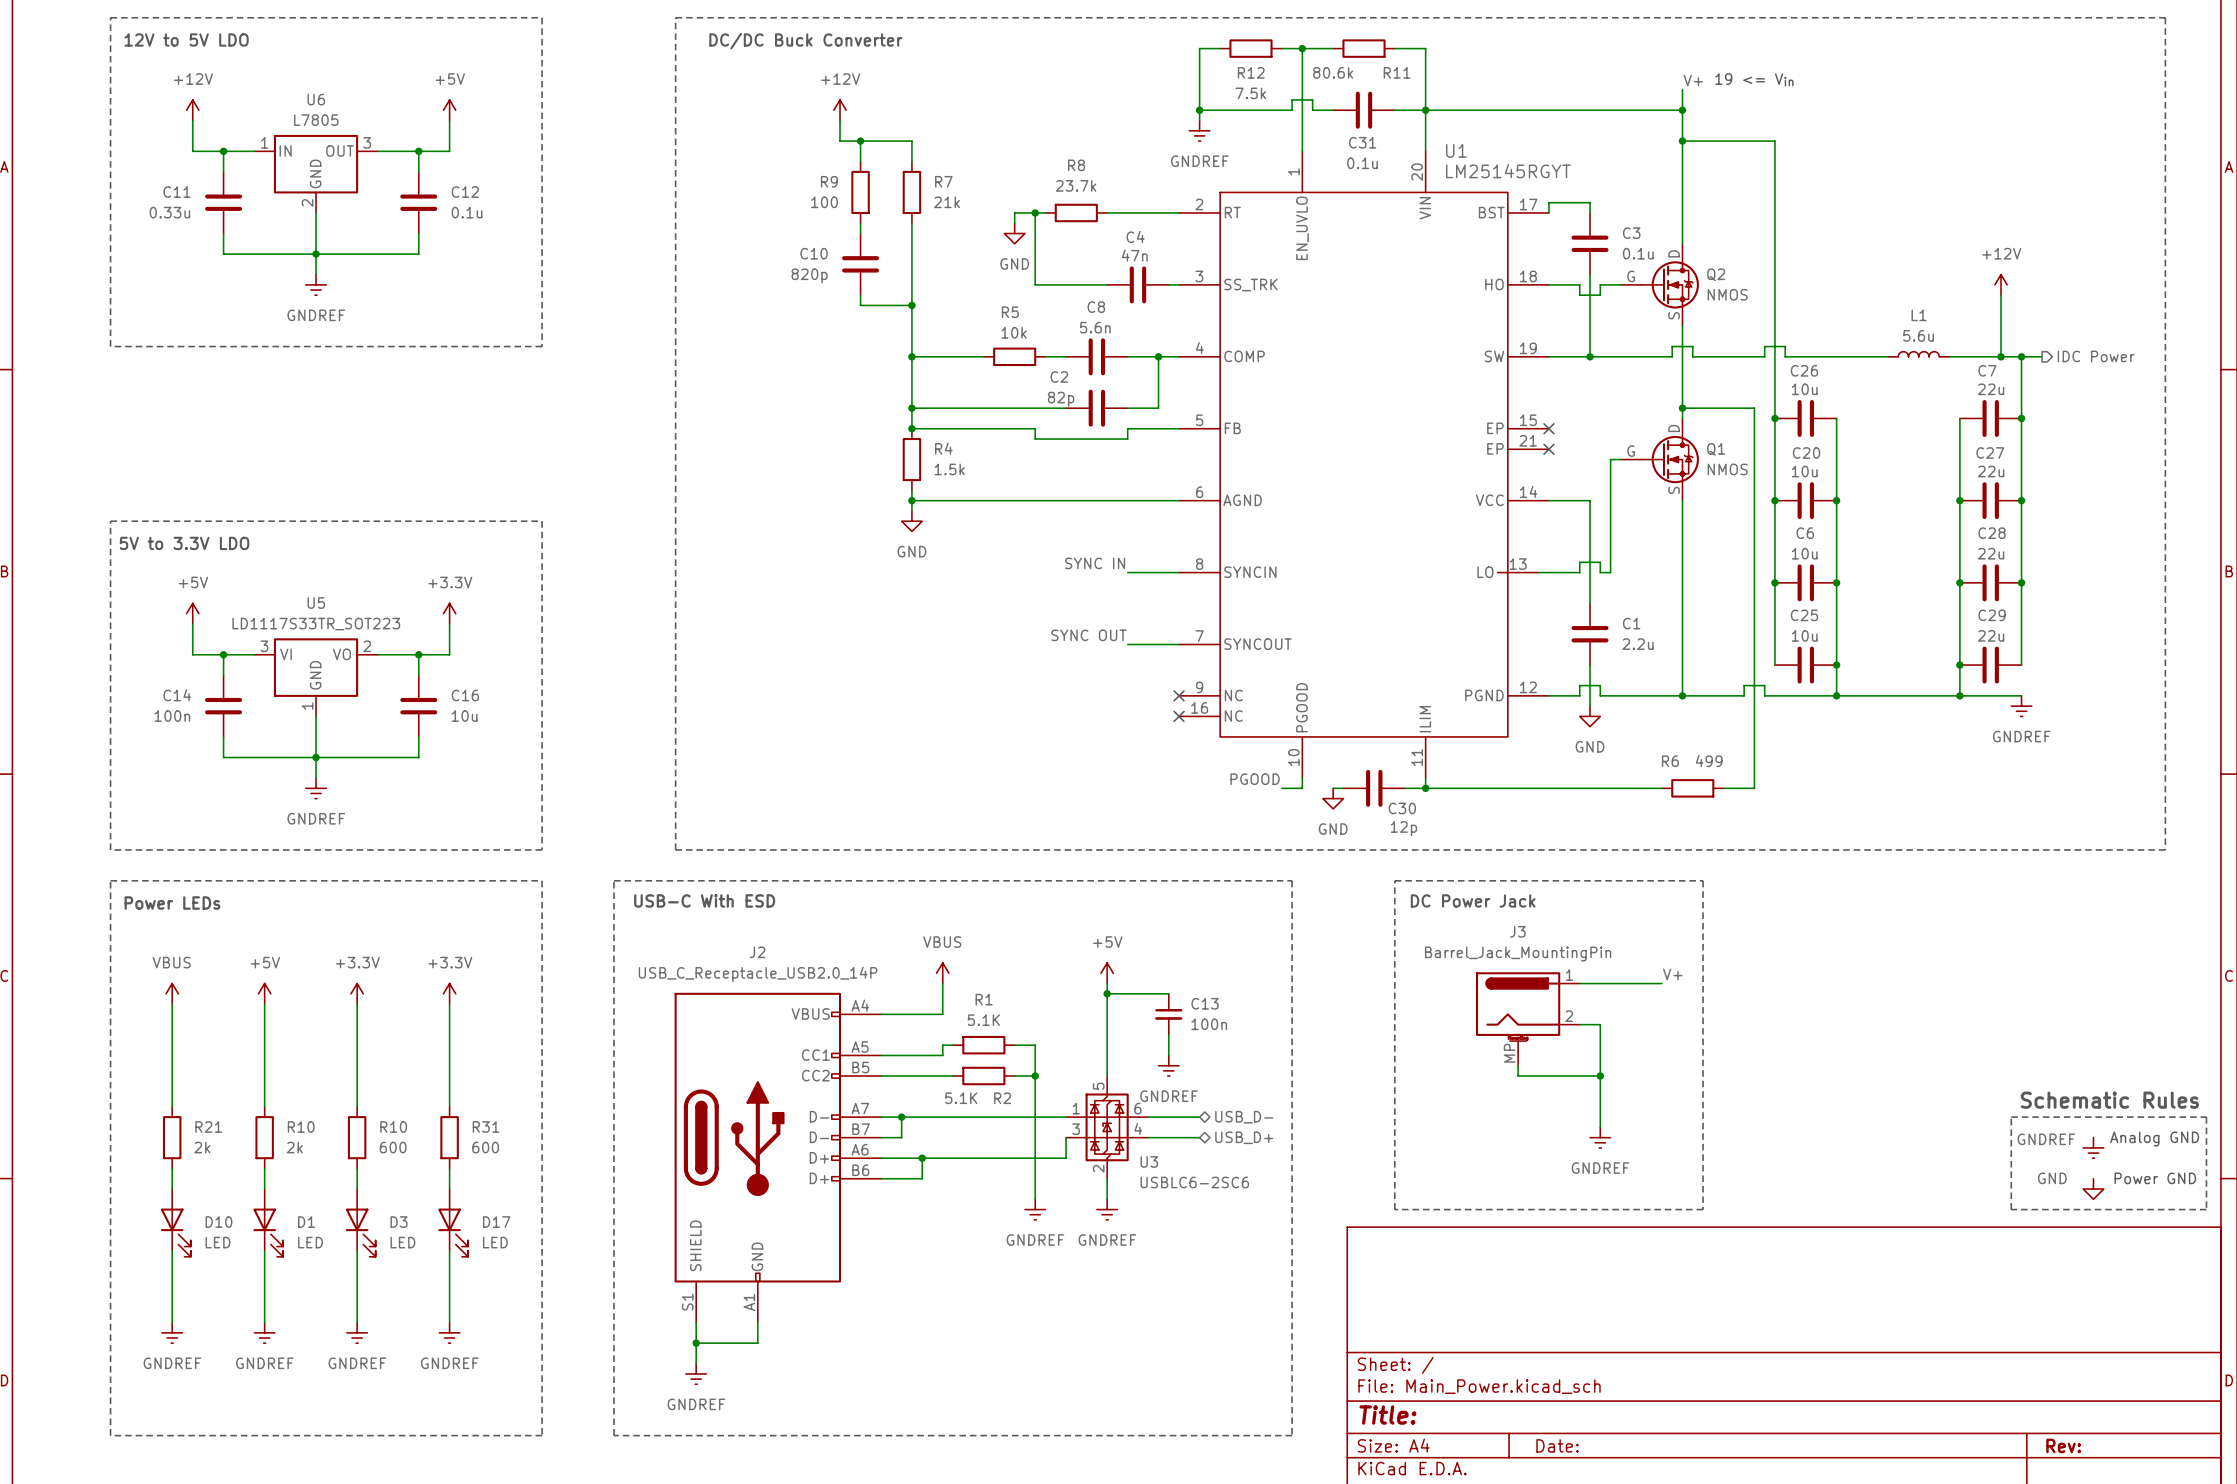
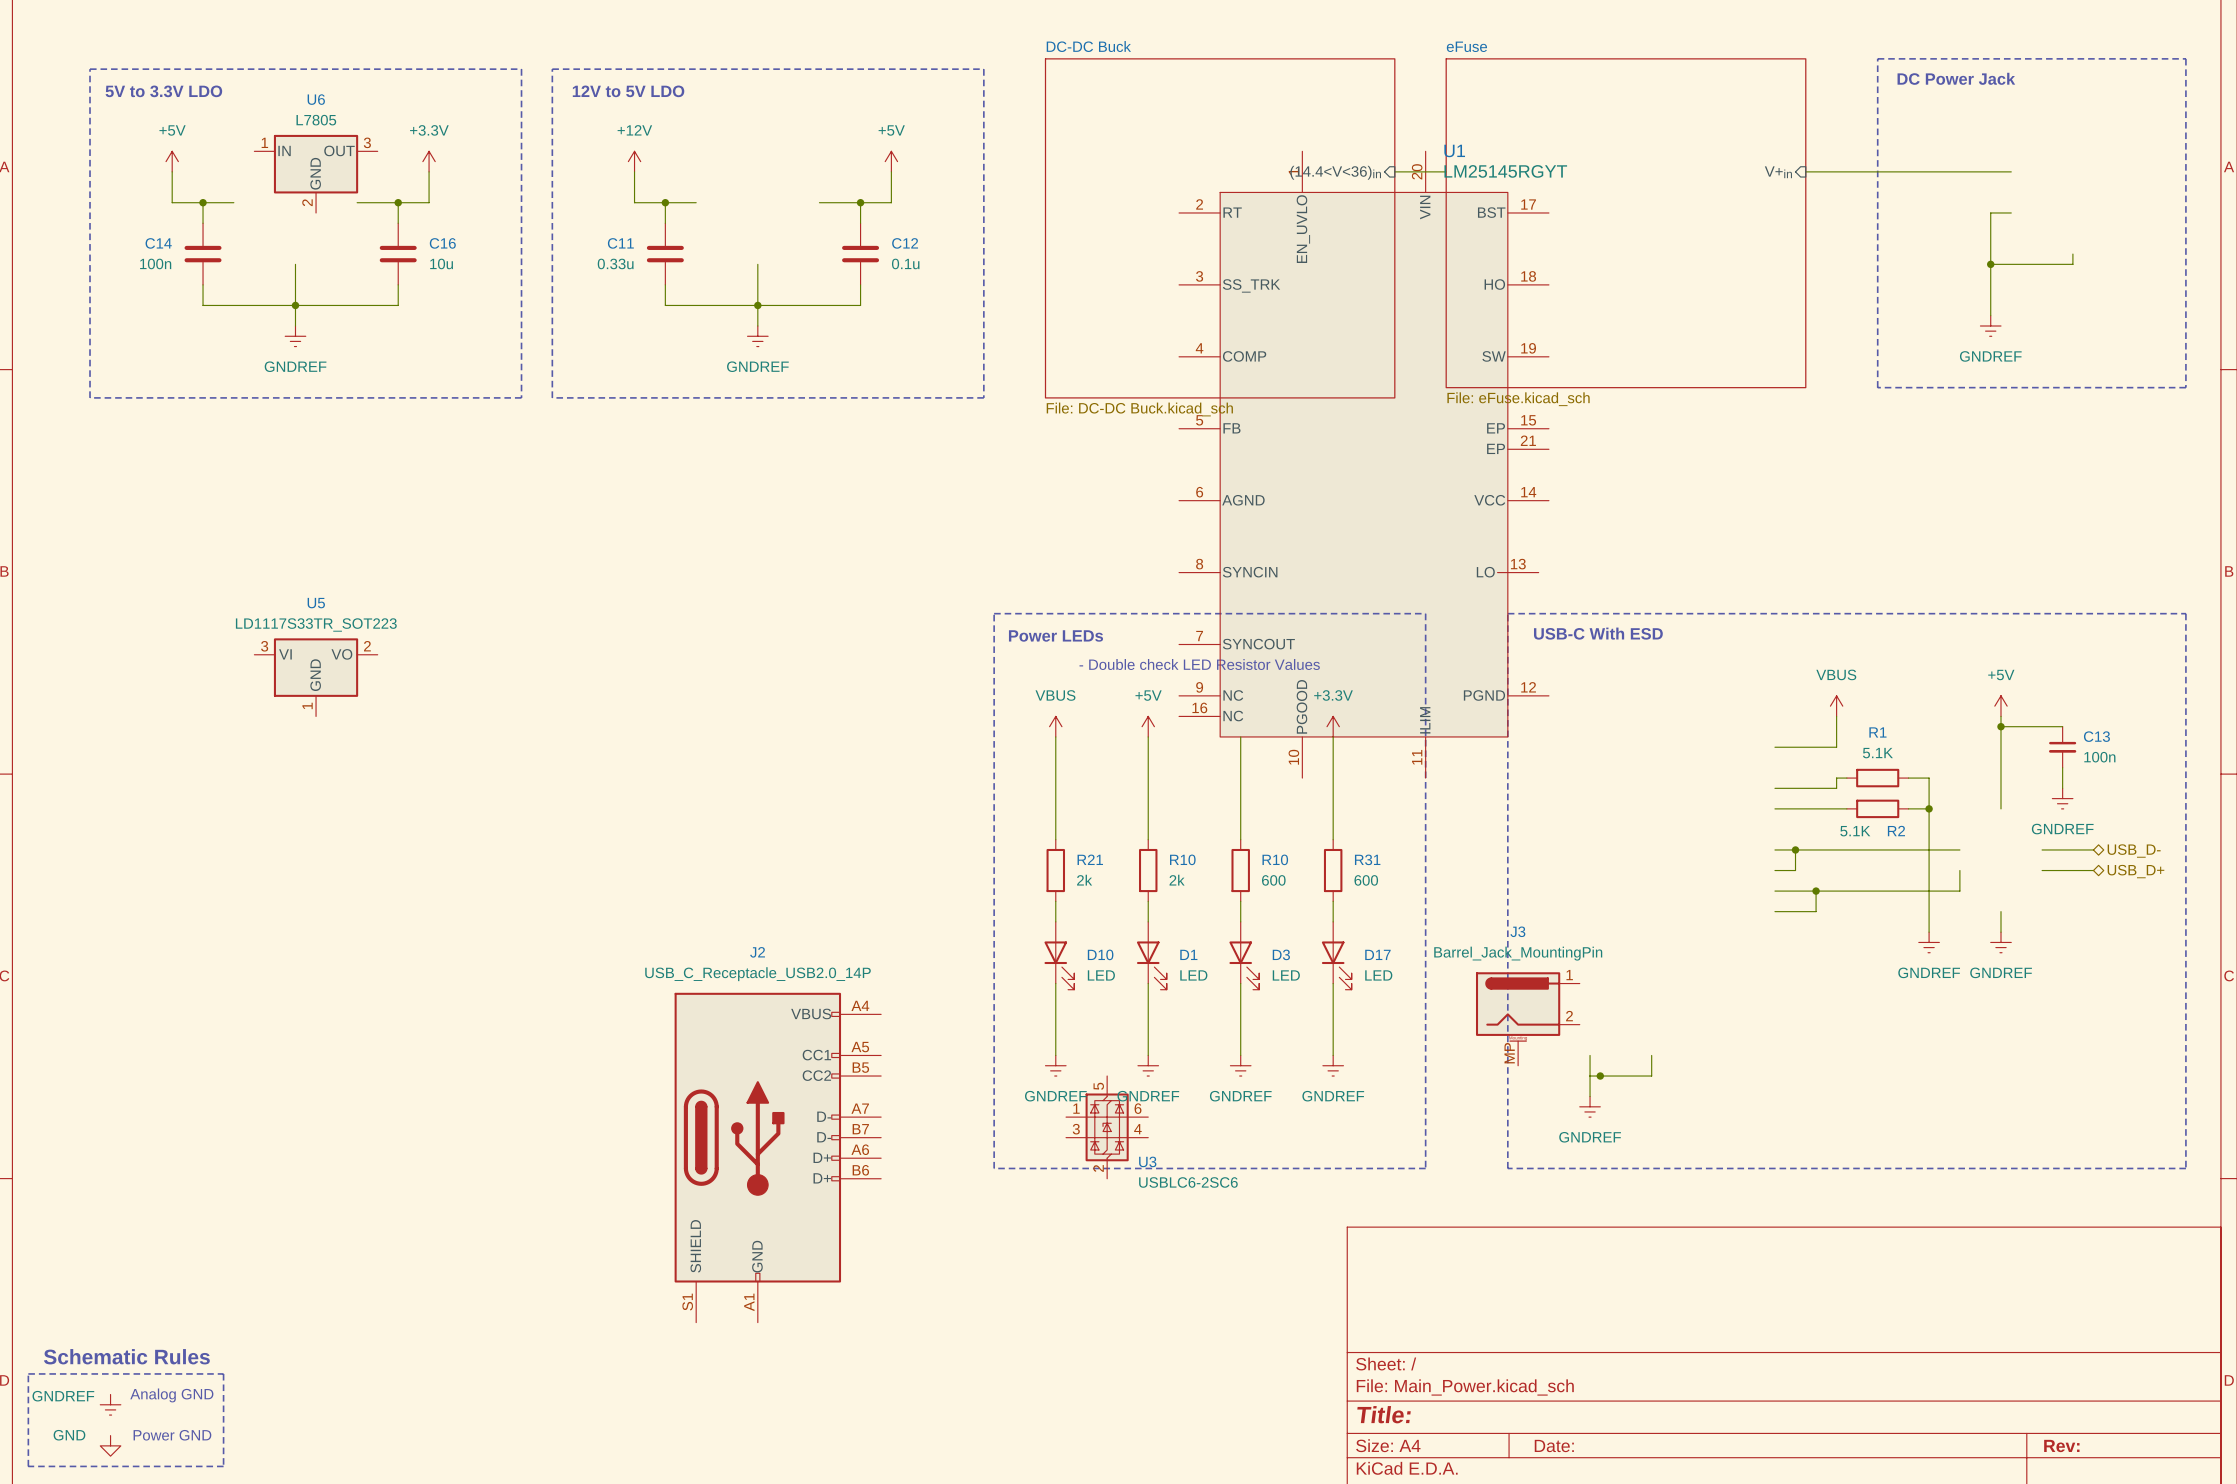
line: (110, 17) (110, 346) (542, 346) (542, 17) (110, 17) -> (90, 69) (90, 397) (521, 397) (521, 69) (90, 69)
line: (675, 17) (2165, 17) (2165, 849) (675, 849) (675, 17) -> none
text: 12V to 5V LDO (186, 39) -> none
text: DC/DC Buck Converter (805, 41) -> none
wire: (1220, 48) (1199, 48) (1199, 120) -> none
R12: 7.5k (1250, 48) -> none
wire: (1281, 48) (1333, 48) -> (1394, 171) (1446, 171)
wire: (1302, 48) (1302, 151) -> none
junction: (1302, 48) -> none
R11: 80.6k (1364, 48) -> none
wire: (1394, 48) (1425, 48) (1425, 151) -> none
line: none -> (1877, 58) (2185, 58) (2185, 387) (1877, 387) (1877, 58)
line: none -> (552, 69) (983, 69) (983, 397) (552, 397) (552, 69)
text: 19 <= Vin (1754, 79) -> none
text: none -> DC Power Jack (1956, 78)
label: V+ (1693, 80) -> none
wire: (1682, 89) (1682, 243) -> none
text: none -> 5V to 3.3V LDO (163, 91)
text: none -> 12V to 5V LDO (628, 91)
power symbol: +12V (192, 110) -> none
power symbol: +5V (449, 110) -> none
power symbol: +12V (840, 110) -> none
wire: (1199, 110) (1292, 110) (1292, 99) (1312, 99) (1312, 110) (1333, 110) -> none
junction: (1199, 110) -> none
C31: 0.1u (1364, 110) -> none
wire: (1394, 110) (1682, 110) -> none
junction: (1425, 110) -> none
junction: (1682, 110) -> none
wire: (192, 120) (192, 151) (254, 151) -> (172, 171) (172, 202) (233, 202)
wire: (449, 120) (449, 151) (377, 151) -> (429, 171) (429, 202) (357, 202)
wire: (840, 120) (840, 141) (911, 141) (911, 161) -> none
power symbol: GNDREF (1199, 130) -> none
wire: (860, 141) (860, 161) -> none
junction: (860, 141) -> none
wire: (1682, 141) (1774, 141) (1774, 665) -> none
junction: (1682, 141) -> none
wire: (223, 151) (223, 171) -> (203, 202) (203, 223)
junction: (223, 151) -> none
wire: (418, 151) (418, 171) -> (398, 202) (398, 223)
junction: (418, 151) -> none
power symbol: none -> +5V (172, 161)
power symbol: none -> +3.3V (429, 161)
power symbol: none -> +12V (634, 161)
power symbol: none -> +5V (891, 161)
wire: none -> (634, 171) (634, 202) (696, 202)
wire: none -> (891, 171) (891, 202) (819, 202)
wire: none -> (1805, 171) (2011, 171)
sheet pin: none -> (14.4<V<36)in (1335, 172)
sheet pin: none -> V+in (1778, 172)
R9: 100 (860, 192) -> none
R7: 21k (911, 192) -> none
junction: none -> (203, 202)
C11 position: (223, 202) -> (665, 254)
junction: none -> (398, 202)
C12 position: (418, 202) -> (860, 254)
wire: none -> (665, 202) (665, 223)
junction: none -> (665, 202)
junction: none -> (860, 202)
wire: (316, 212) (316, 274) -> (295, 264) (295, 326)
wire: (1035, 212) (1035, 284) (1107, 284) -> none
junction: (1035, 212) -> none
wire: (1045, 212) (1014, 212) (1014, 223) -> none
R8: 23.7k (1076, 212) -> none
wire: (1107, 212) (1179, 212) -> none
wire: (1548, 212) (1548, 202) (1590, 202) (1590, 212) -> none
wire: none -> (2011, 212) (1990, 212) (1990, 315)
wire: (911, 223) (911, 428) (1035, 428) (1035, 439) (1127, 439) (1127, 428) (1179, 428) -> none
sheet eFuse: none -> File: eFuse.kicad_sch (1625, 223)
sheet DC-DC Buck: none -> File: DC-DC Buck.kicad_sch (1220, 228)
wire: (223, 233) (223, 254) (418, 254) (418, 233) -> (203, 284) (203, 305) (398, 305) (398, 284)
power symbol: GND (1014, 233) -> none
C3: 0.1u (1590, 243) -> none
junction: (316, 254) -> none
wire: none -> (2072, 254) (2072, 264) (1990, 264)
wire: none -> (757, 264) (757, 326)
C10: 820p (860, 264) -> none
junction: none -> (1990, 264)
wire: (1590, 274) (1590, 356) -> none
power symbol position: GNDREF (316, 284) -> GNDREF (295, 336)
C4: 47n (1137, 284) -> none
wire: (1168, 284) (1179, 284) -> none
wire: (1548, 284) (1579, 284) (1579, 295) (1600, 295) (1600, 284) (1620, 284) -> none
Q2: NMOS (1659, 284) -> none
power symbol: +12V (2000, 284) -> none
wire: (2000, 295) (2000, 356) -> none
junction: none -> (295, 305)
junction: none -> (757, 305)
wire: (860, 305) (911, 305) -> (860, 305) (665, 305) (665, 284)
junction: (911, 305) -> none
wire: (1682, 326) (1682, 418) -> none
power symbol: none -> GNDREF (1990, 326)
power symbol: none -> GNDREF (757, 336)
L1: 5.6u (1918, 354) -> none
wire: (911, 356) (983, 356) -> none
junction: (911, 356) -> none
R5: 10k (1014, 356) -> none
wire: (1045, 356) (1066, 356) -> none
C8: 5.6n (1096, 356) -> none
wire: (1127, 356) (1179, 356) -> none
wire: (1158, 356) (1158, 408) (1127, 408) -> none
junction: (1158, 356) -> none
wire: (1548, 356) (1672, 356) (1672, 346) (1692, 346) (1692, 356) (1764, 356) (1764, 346) (1785, 346) (1785, 356) (1887, 356) -> none
junction: (1590, 356) -> none
wire: (1949, 356) (2042, 356) -> none
junction: (2000, 356) -> none
wire: (2021, 356) (2021, 665) -> none
junction: (2021, 356) -> none
hierarchical label: IDC Power (2096, 356) -> none
wire: (911, 408) (1066, 408) -> none
junction: (911, 408) -> none
C2: 82p (1096, 408) -> none
wire: (1682, 408) (1754, 408) (1754, 788) (1723, 788) -> none
junction: (1682, 408) -> none
junction: (1774, 418) -> none
C26: 10u (1805, 418) -> none
wire: (1836, 418) (1836, 695) -> none
wire: (1959, 418) (1959, 695) -> none
C7: 22u (1990, 418) -> none
junction: (2021, 418) -> none
junction: (911, 428) -> none
no-connect mark: (1548, 428) -> none
no-connect mark: (1548, 449) -> none
R4: 1.5k (911, 459) -> none
wire: (1620, 459) (1610, 459) (1610, 572) (1600, 572) (1600, 562) (1579, 562) (1579, 572) (1538, 572) -> none
Q1: NMOS (1659, 459) -> none
wire: (911, 490) (911, 510) -> none
wire: (911, 500) (1179, 500) -> none
junction: (911, 500) -> none
wire: (1548, 500) (1590, 500) (1590, 603) -> none
wire: (1682, 500) (1682, 695) -> none
junction: (1774, 500) -> none
C20: 10u (1805, 500) -> none
junction: (1836, 500) -> none
junction: (1959, 500) -> none
C27: 22u (1990, 500) -> none
junction: (2021, 500) -> none
line: (110, 521) (542, 521) (542, 849) (110, 849) (110, 521) -> none
power symbol: GND (911, 521) -> none
text: 5V to 3.3V LDO (184, 543) -> none
label: SYNC IN (1095, 563) -> none
wire: (1127, 572) (1179, 572) -> none
junction: (1774, 582) -> none
C6: 10u (1805, 582) -> none
junction: (1836, 582) -> none
junction: (1959, 582) -> none
C28: 22u (1990, 582) -> none
junction: (2021, 582) -> none
power symbol: +5V (192, 613) -> none
power symbol: +3.3V (449, 613) -> none
line: none -> (994, 613) (1425, 613) (1425, 1168) (994, 1168) (994, 613)
line: none -> (1507, 613) (2185, 613) (2185, 1168) (1507, 1168) (1507, 613)
wire: (192, 623) (192, 654) (254, 654) -> none
wire: (449, 623) (449, 654) (377, 654) -> none
text: none -> USB-C With ESD (1598, 633)
C1: 2.2u (1590, 634) -> none
text: none -> Power LEDs (1055, 635)
label: SYNC OUT (1088, 635) -> none
wire: (1127, 644) (1179, 644) -> none
wire: (223, 654) (223, 675) -> none
junction: (223, 654) -> none
wire: (418, 654) (418, 675) -> none
junction: (418, 654) -> none
text: none -> - Double check LED Resistor Values (1199, 664)
wire: (1590, 665) (1590, 706) -> none
C25: 10u (1805, 665) -> none
junction: (1836, 665) -> none
junction: (1959, 665) -> none
C29: 22u (1990, 665) -> none
no-connect mark: (1179, 695) -> none
wire: (1548, 695) (1579, 695) (1579, 685) (1600, 685) (1600, 695) (1744, 695) (1744, 685) (1764, 685) (1764, 695) (2021, 695) -> none
junction: (1682, 695) -> none
junction: (1836, 695) -> none
junction: (1959, 695) -> none
C14 position: (223, 706) -> (203, 254)
C16 position: (418, 706) -> (398, 254)
power symbol: none -> VBUS (1836, 706)
power symbol: none -> +5V (2000, 706)
power symbol position: GNDREF (2021, 706) -> GNDREF (2062, 798)
wire: (316, 716) (316, 778) -> none
no-connect mark: (1179, 716) -> none
power symbol: GND (1590, 716) -> none
wire: none -> (1836, 716) (1836, 747) (1774, 747)
wire: none -> (2000, 716) (2000, 808)
power symbol: none -> VBUS (1055, 726)
power symbol: none -> +5V (1148, 726)
power symbol: none -> +3.3V (1333, 726)
wire: none -> (2000, 726) (2062, 726)
junction: none -> (2000, 726)
wire: (223, 736) (223, 757) (418, 757) (418, 736) -> none
wire: none -> (1055, 736) (1055, 839)
wire: none -> (1148, 736) (1148, 839)
wire: none -> (1240, 736) (1240, 839)
wire: none -> (1333, 736) (1333, 839)
junction: (316, 757) -> none
wire: none -> (2062, 767) (2062, 788)
wire: (1302, 778) (1302, 788) (1281, 788) -> none
wire: none -> (1846, 778) (1836, 778) (1836, 788) (1774, 788)
wire: none -> (1908, 778) (1929, 778) (1929, 932)
label: PGOOD (1255, 779) -> none
power symbol: GNDREF (316, 788) -> none
wire: (1333, 788) (1343, 788) -> none
C30: 12p (1374, 788) -> none
wire: (1405, 788) (1661, 788) -> none
junction: (1425, 788) -> none
R6: 499 (1692, 788) -> none
power symbol: GND (1333, 798) -> none
wire: none -> (1774, 808) (1846, 808)
wire: none -> (1908, 808) (1929, 808)
junction: none -> (1929, 808)
wire: none -> (1795, 849) (1795, 870) (1774, 870)
junction: none -> (1795, 849)
hierarchical label: none -> USB_D- (2134, 851)
R10: none -> 2k (1148, 870)
R10: none -> 600 (1240, 870)
wire: none -> (1959, 870) (1959, 891) (1774, 891)
wire: none -> (2042, 870) (2093, 870)
hierarchical label: none -> USB_D+ (2135, 871)
line: (110, 880) (110, 1435) (542, 1435) (542, 880) (110, 880) -> none
line: (613, 880) (1292, 880) (1292, 1435) (613, 1435) (613, 880) -> none
line: (1394, 880) (1703, 880) (1703, 1209) (1394, 1209) (1394, 880) -> none
wire: none -> (1816, 891) (1816, 911) (1774, 911)
junction: none -> (1816, 891)
text: USB-C With ESD (704, 900) -> none
text: DC Power Jack (1473, 900) -> none
wire: none -> (1055, 901) (1055, 921)
wire: none -> (1240, 901) (1240, 921)
wire: none -> (1333, 901) (1333, 921)
text: Power LEDs (172, 903) -> none
wire: none -> (2000, 911) (2000, 932)
power symbol: none -> GNDREF (1929, 942)
power symbol: none -> GNDREF (2000, 942)
power symbol: VBUS (942, 973) -> none
power symbol: +5V (1107, 973) -> none
label: V+ (1672, 974) -> none
wire: (942, 983) (942, 1014) (881, 1014) -> none
wire: none -> (1055, 983) (1055, 1055)
wire: (1107, 983) (1107, 1076) -> none
wire: none -> (1148, 983) (1148, 1055)
wire: none -> (1240, 983) (1240, 1055)
wire: none -> (1333, 983) (1333, 1055)
wire: (1579, 983) (1661, 983) -> none
power symbol: VBUS (172, 993) -> none
power symbol: +5V (264, 993) -> none
power symbol: +3.3V (357, 993) -> none
power symbol: +3.3V (449, 993) -> none
wire: (1107, 993) (1168, 993) -> none
junction: (1107, 993) -> none
wire: (172, 1004) (172, 1106) -> none
wire: (264, 1004) (264, 1106) -> none
wire: (357, 1004) (357, 1106) -> none
wire: (449, 1004) (449, 1106) -> none
C13 position: (1168, 1014) -> (2062, 747)
wire: (1579, 1024) (1600, 1024) (1600, 1127) -> none
wire: (1168, 1034) (1168, 1055) -> (1148, 901) (1148, 921)
wire: (953, 1045) (942, 1045) (942, 1055) (881, 1055) -> none
R1 position: (983, 1045) -> (1877, 778)
wire: (1014, 1045) (1035, 1045) (1035, 1199) -> none
wire: none -> (1590, 1055) (1590, 1096)
wire: none -> (1651, 1055) (1651, 1076) (1600, 1076)
power symbol: none -> GNDREF (1055, 1065)
power symbol position: GNDREF (1168, 1065) -> GNDREF (1148, 1065)
power symbol: none -> GNDREF (1240, 1065)
power symbol: none -> GNDREF (1333, 1065)
wire: (1518, 1065) (1518, 1076) (1590, 1076) -> none
wire: (881, 1076) (953, 1076) -> none
R2 position: (983, 1076) -> (1877, 808)
wire: (1014, 1076) (1035, 1076) -> none
junction: (1035, 1076) -> none
text: Schematic Rules (2109, 1100) -> none
wire: (881, 1117) (1066, 1117) -> none
wire: (901, 1117) (901, 1137) (881, 1137) -> none
junction: (901, 1117) -> none
wire: (1148, 1117) (1199, 1117) -> none
hierarchical label: USB_D- (1244, 1117) -> none
line: (2011, 1117) (2206, 1117) (2206, 1209) (2011, 1209) (2011, 1117) -> none
R21 position: (172, 1137) -> (1055, 870)
R10: 2k (264, 1137) -> none
R10: 600 (357, 1137) -> none
R31 position: (449, 1137) -> (1333, 870)
wire: (1066, 1137) (1066, 1158) (881, 1158) -> none
wire: (1148, 1137) (1199, 1137) -> none
hierarchical label: USB_D+ (1244, 1137) -> none
power symbol position: GNDREF (1600, 1137) -> GNDREF (1590, 1106)
text: Analog GND (2154, 1139) -> none
power symbol: GNDREF (2093, 1147) -> none
wire: (922, 1158) (922, 1178) (881, 1178) -> none
junction: (922, 1158) -> none
wire: (172, 1168) (172, 1189) -> none
wire: (264, 1168) (264, 1189) -> none
wire: (357, 1168) (357, 1189) -> none
wire: (449, 1168) (449, 1189) -> none
wire: (1107, 1178) (1107, 1199) -> none
text: Power GND (2155, 1178) -> none
power symbol: GND (2093, 1189) -> none
power symbol: GNDREF (1035, 1209) -> none
power symbol: GNDREF (1107, 1209) -> none
D10 position: (175, 1222) -> (1059, 955)
D1 position: (268, 1222) -> (1151, 955)
D3 position: (360, 1222) -> (1244, 955)
D17 position: (453, 1222) -> (1336, 955)
wire: (172, 1250) (172, 1322) -> none
wire: (264, 1250) (264, 1322) -> none
wire: (357, 1250) (357, 1322) -> none
wire: (449, 1250) (449, 1322) -> none
wire: (696, 1322) (696, 1363) -> none
wire: (757, 1322) (757, 1343) (696, 1343) -> none
power symbol: GNDREF (172, 1332) -> none
power symbol: GNDREF (264, 1332) -> none
power symbol: GNDREF (357, 1332) -> none
power symbol: GNDREF (449, 1332) -> none
junction: (696, 1343) -> none
text: none -> Schematic Rules (126, 1356)
line: none -> (28, 1373) (223, 1373) (223, 1466) (28, 1466) (28, 1373)
power symbol: GNDREF (696, 1373) -> none
text: none -> Analog GND (171, 1395)
power symbol: none -> GNDREF (110, 1404)
text: none -> Power GND (172, 1435)
power symbol: none -> GND (110, 1445)

